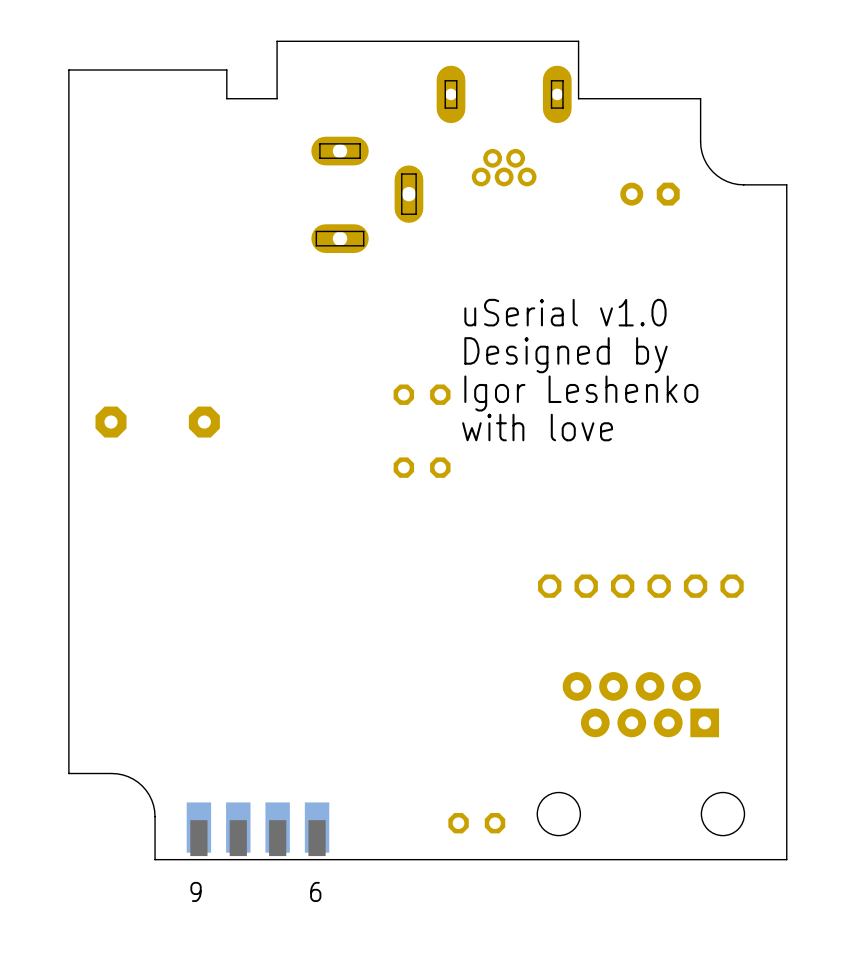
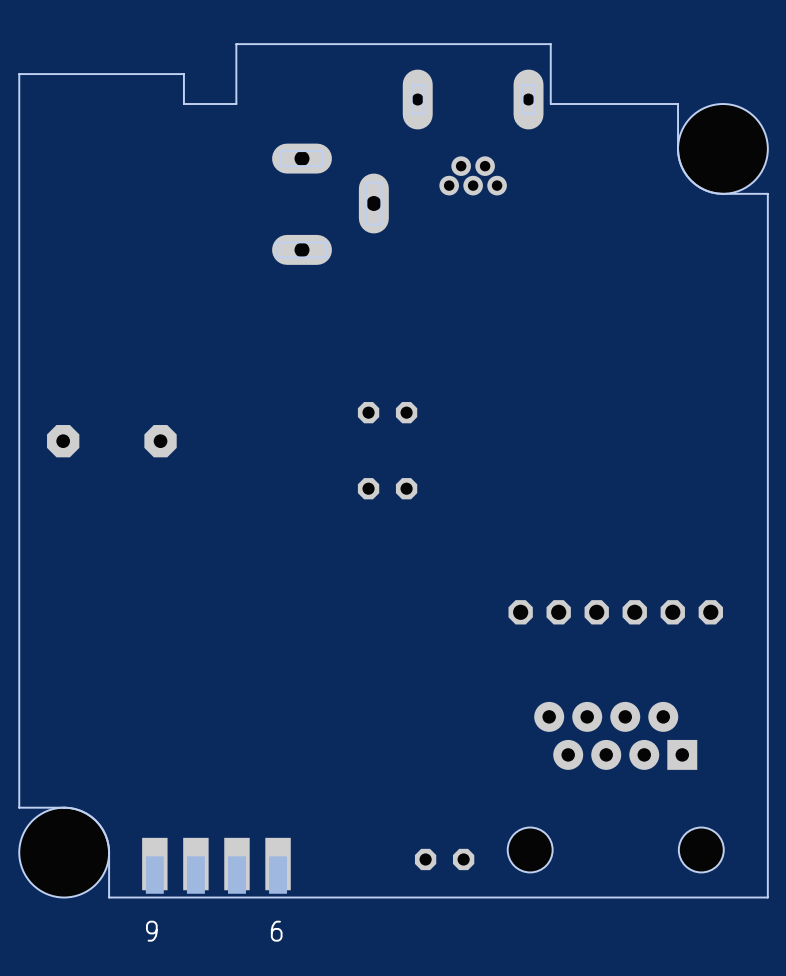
hole: none -> (722, 148)
part: (650, 194) -> none
text: uSerial v1.0 (565, 312) -> none
text: Designed by (566, 355) -> none
text: Igor Leshenko (581, 393) -> none
text: with love (537, 427) -> none
hole: none -> (64, 852)

